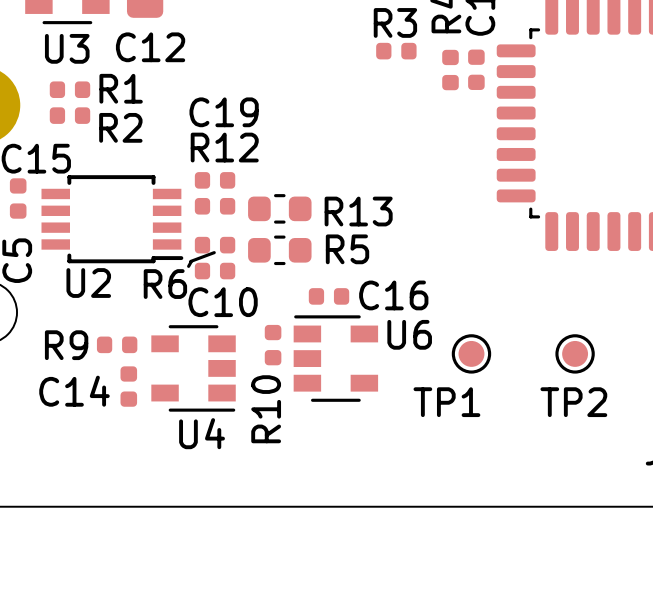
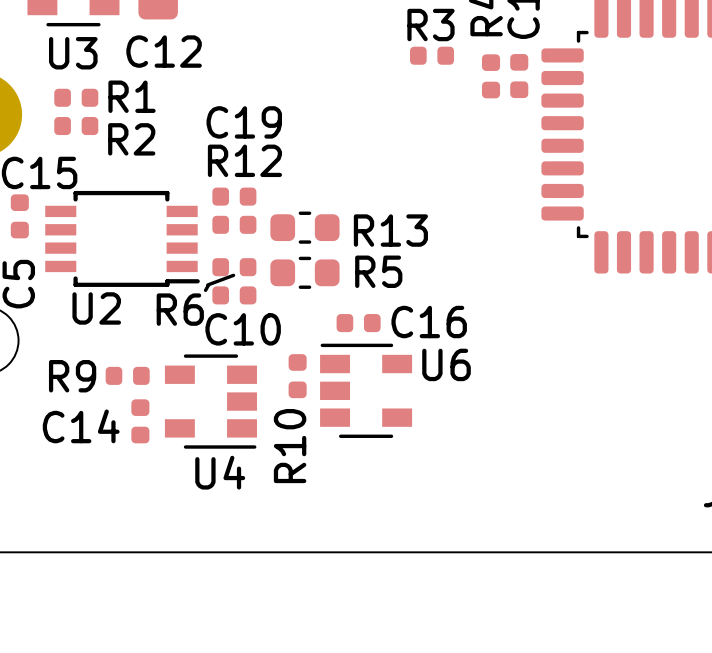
TP1: (471, 353) -> none
TP2: (575, 353) -> none

